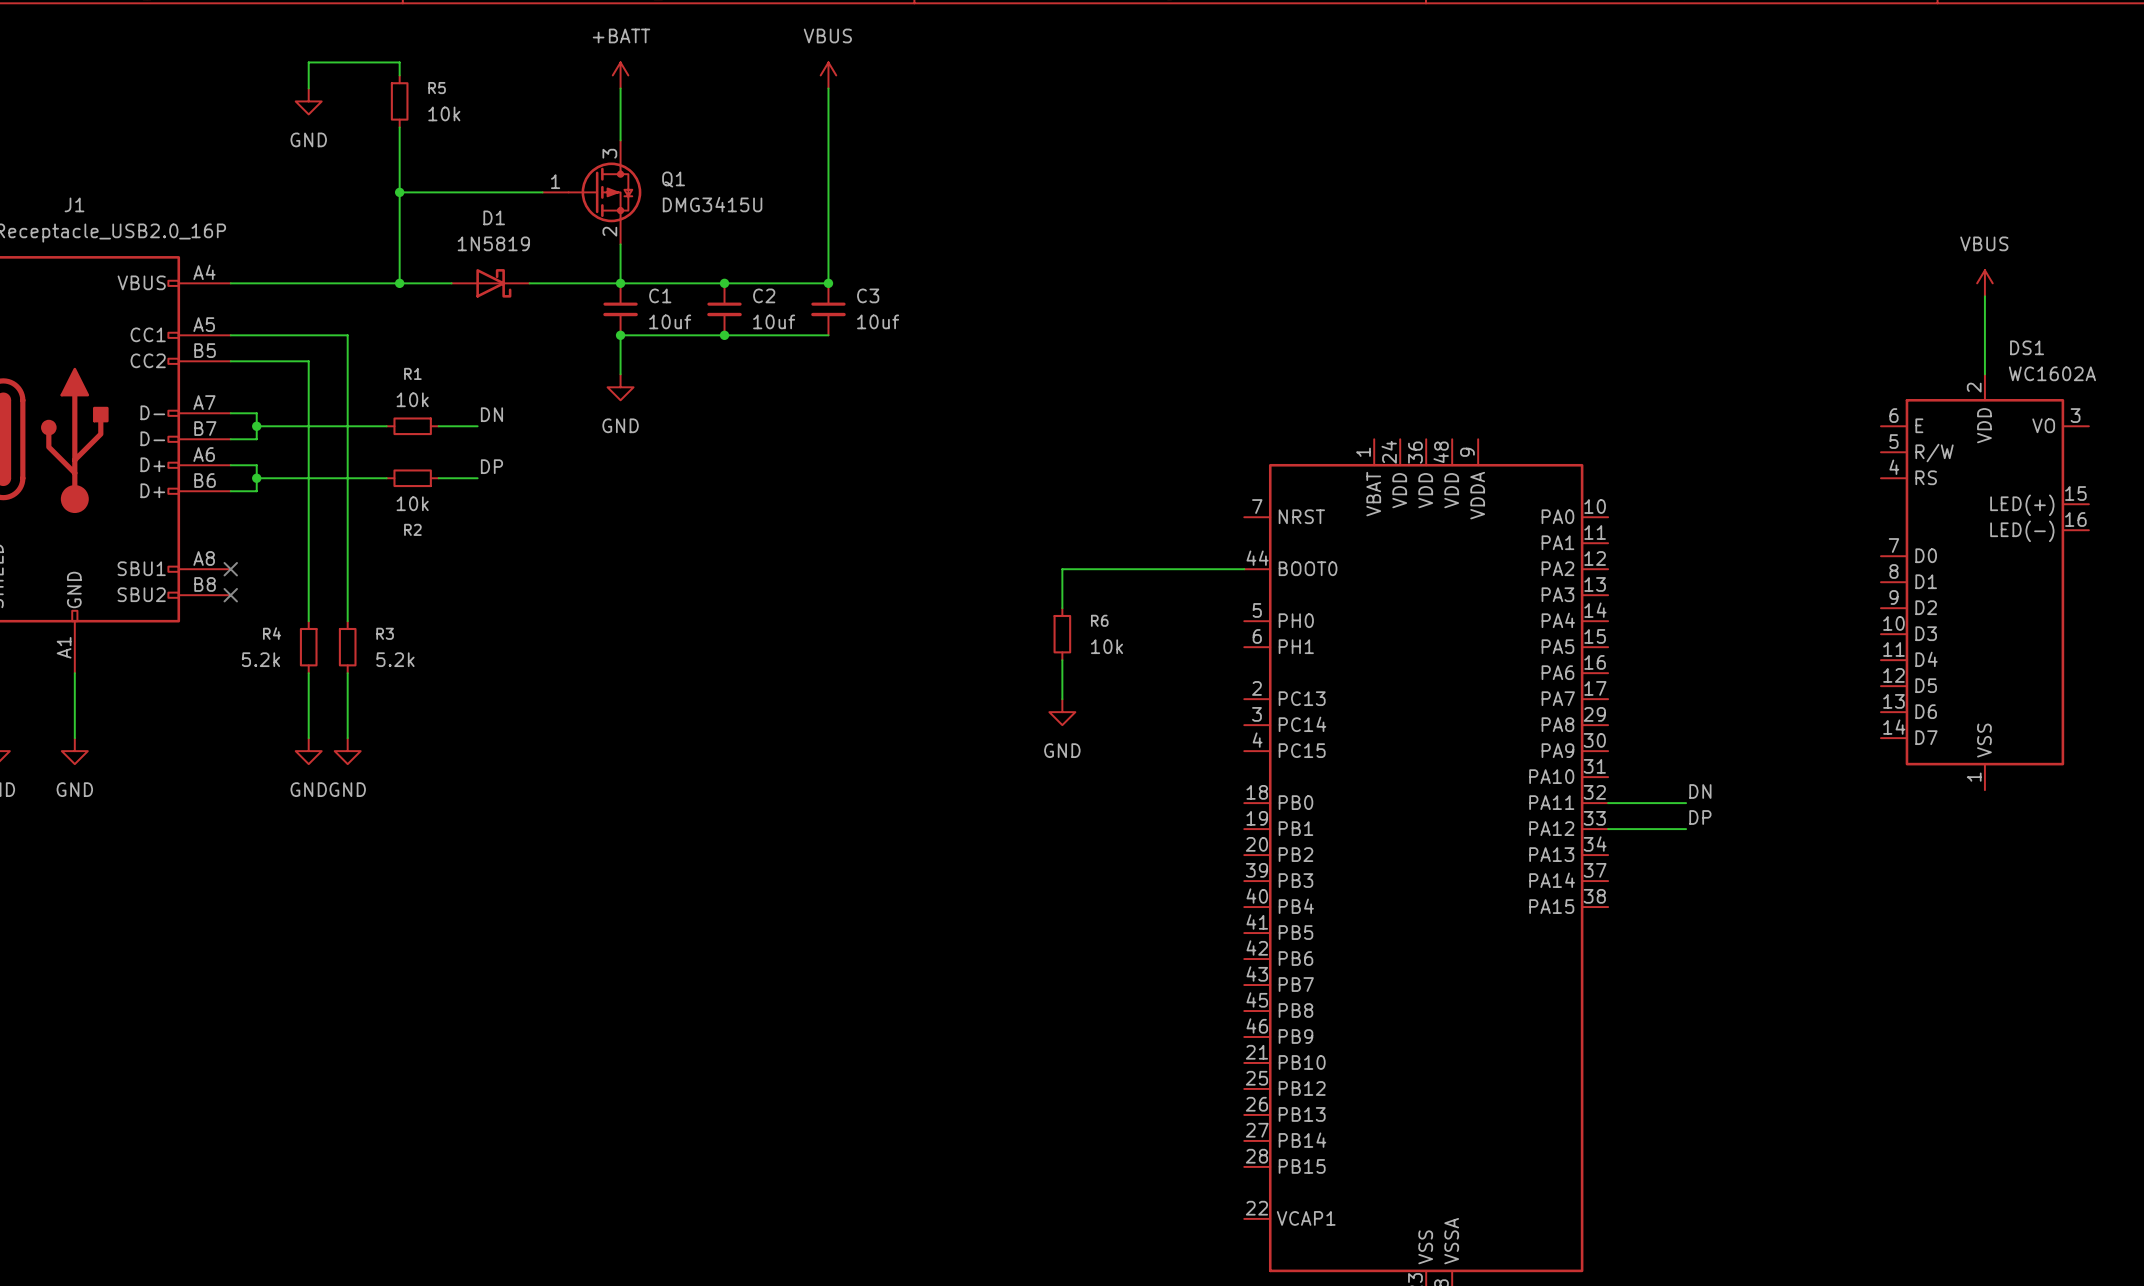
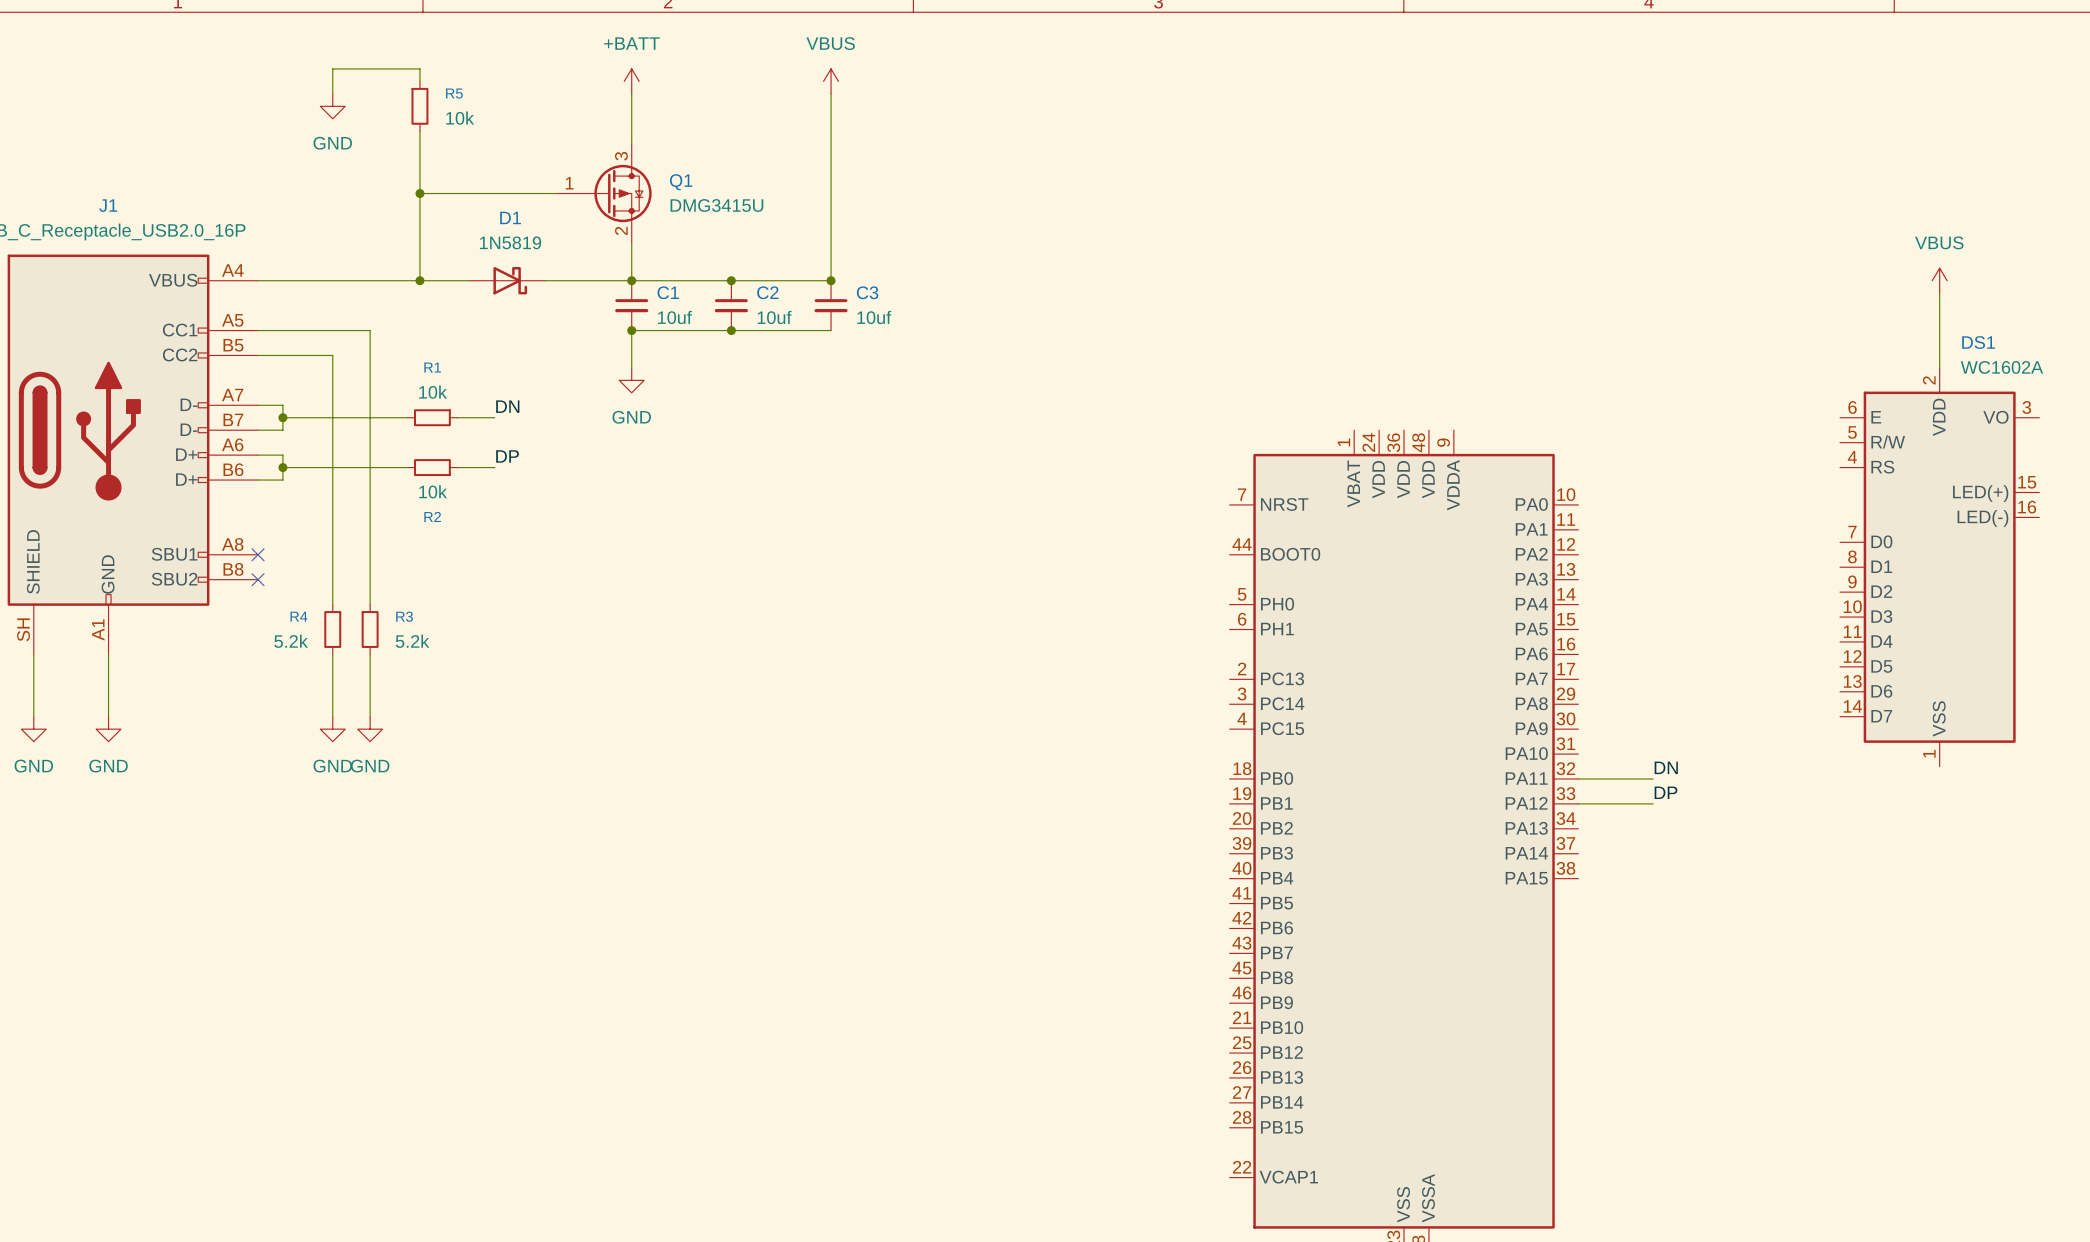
wire: (1244, 569) (1062, 569) (1062, 608) -> none
R6: 10k (1062, 634) -> none
wire: (1062, 660) (1062, 699) -> none
power symbol: GND (1062, 712) -> none

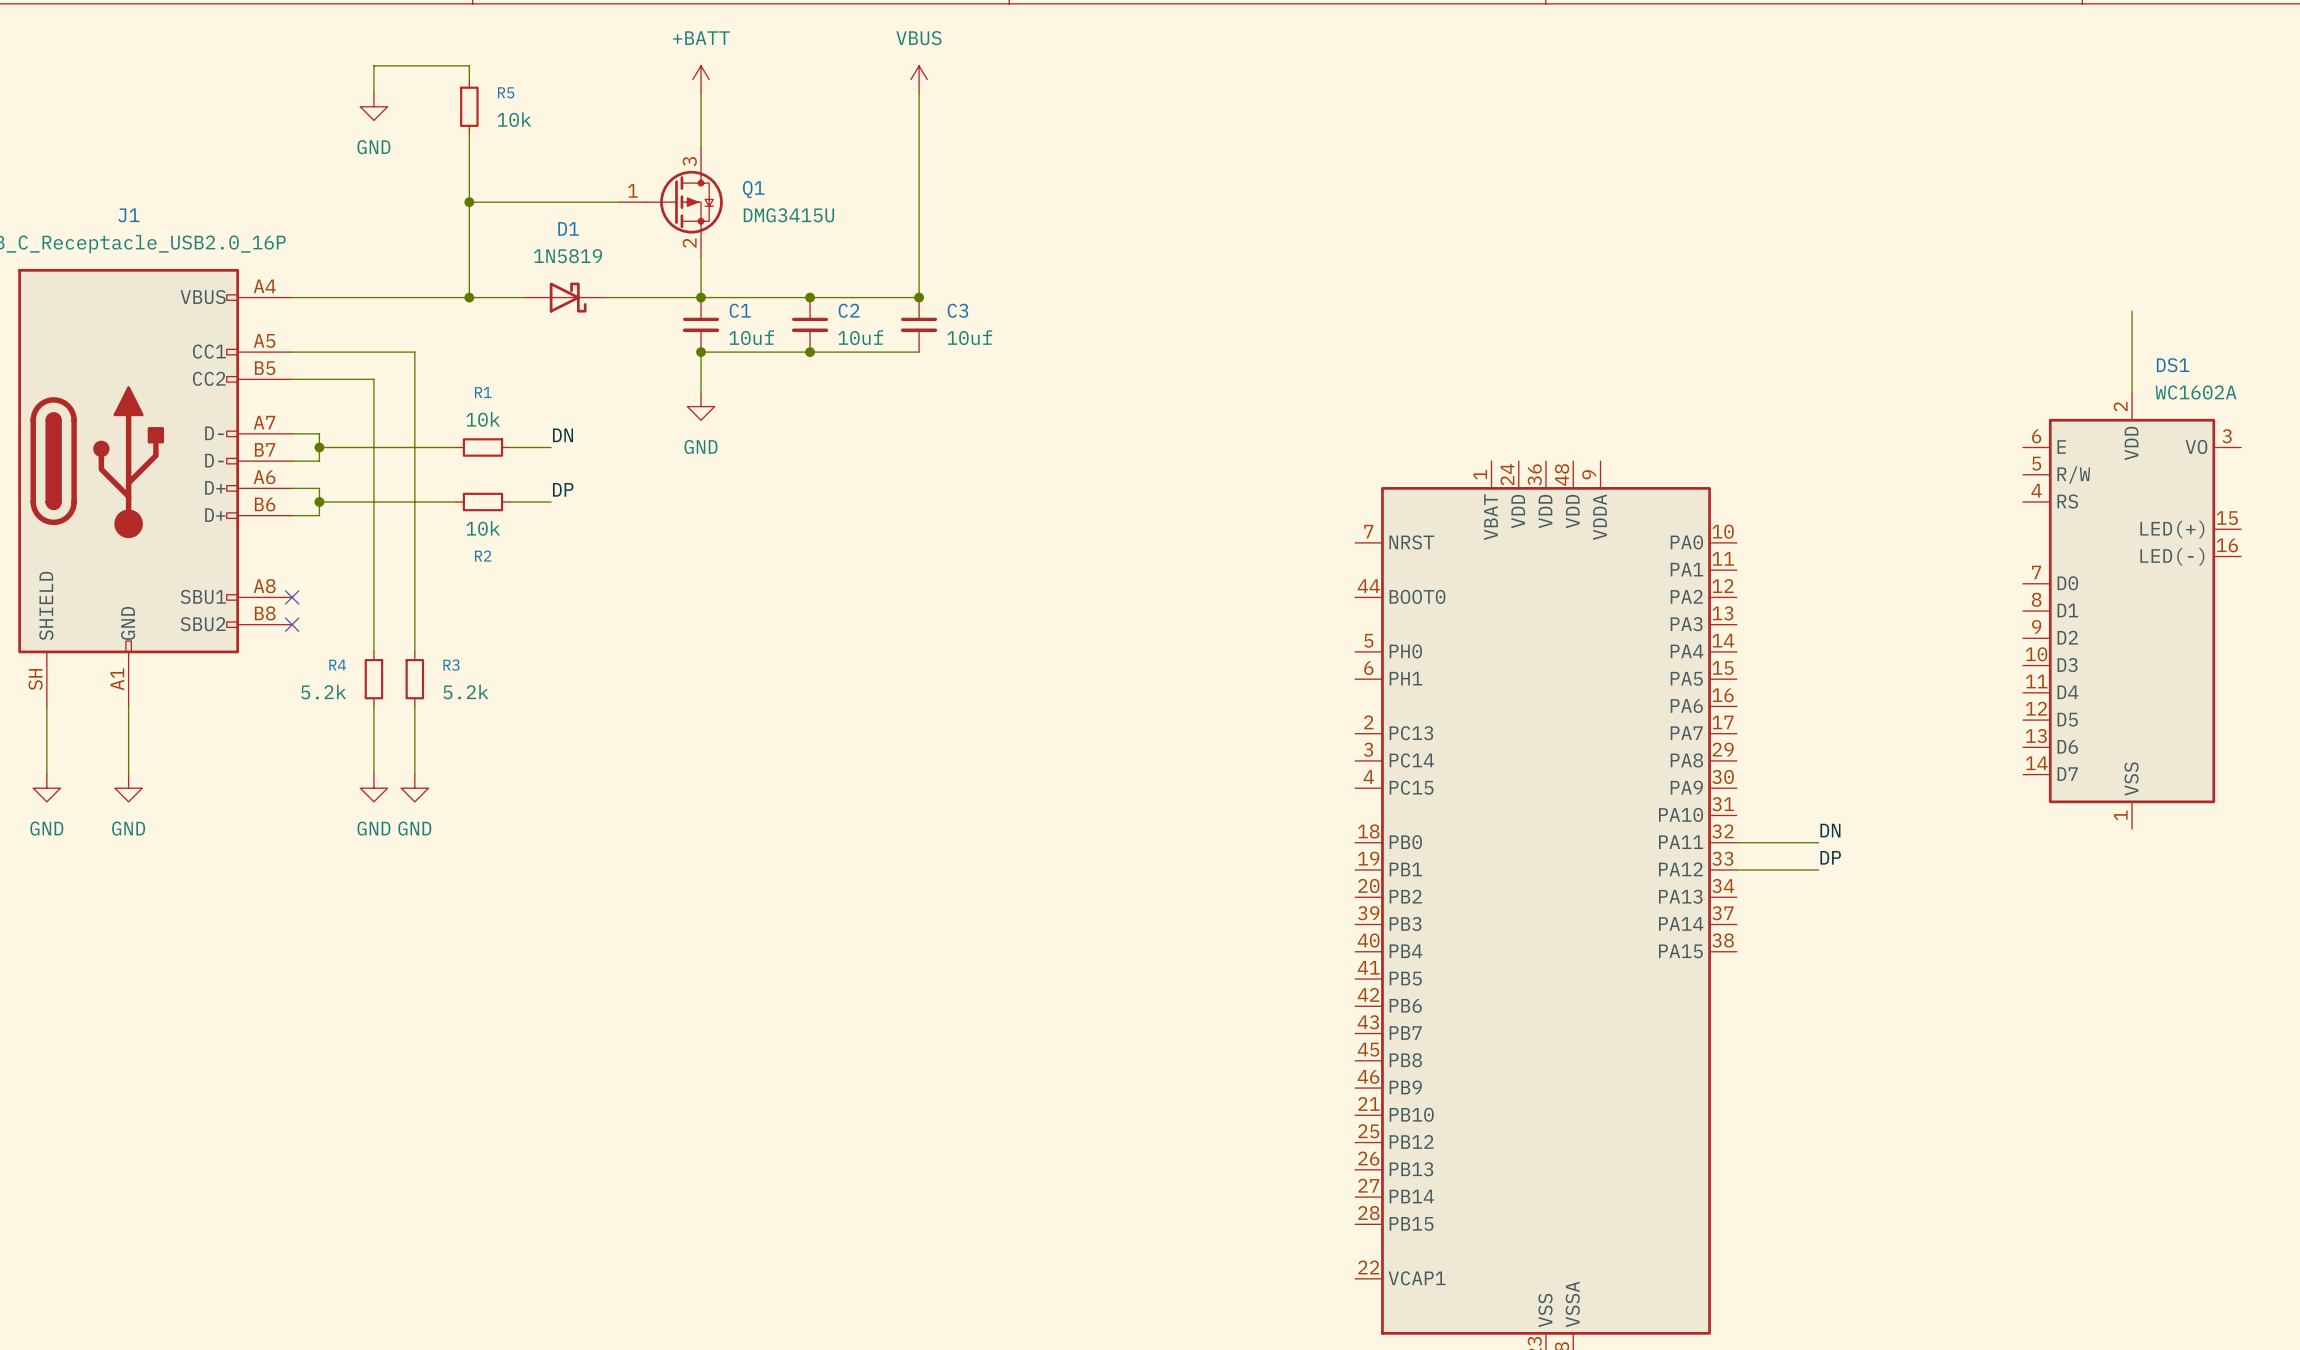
power symbol: VBUS (1939, 280) -> none

